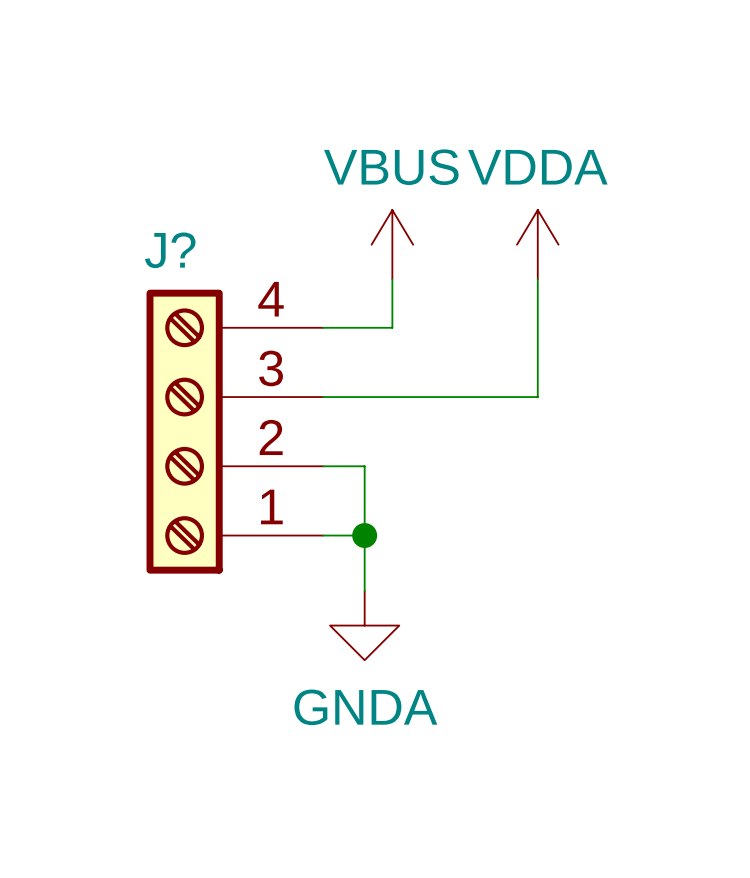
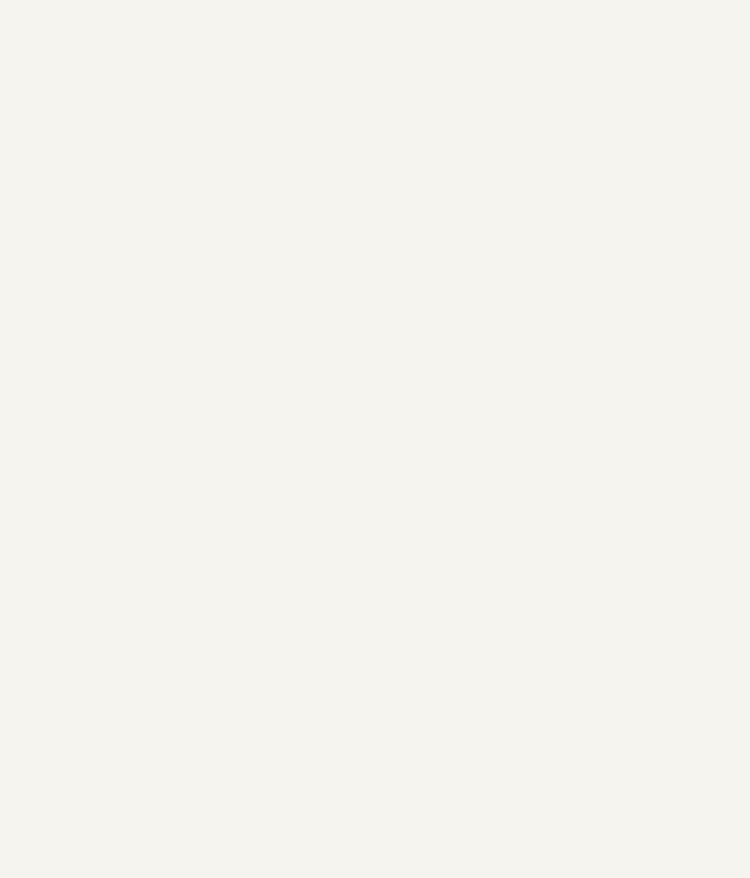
power symbol: VBUS (392, 244) -> none
power symbol: VDDA (537, 244) -> none
wire: (392, 279) (392, 327) (323, 327) -> none
wire: (537, 279) (537, 397) (323, 397) -> none
J?: (234, 431) -> none
wire: (323, 466) (364, 466) (364, 590) -> none
wire: (323, 535) (364, 535) -> none
junction: (364, 535) -> none
power symbol: GNDA (364, 625) -> none

